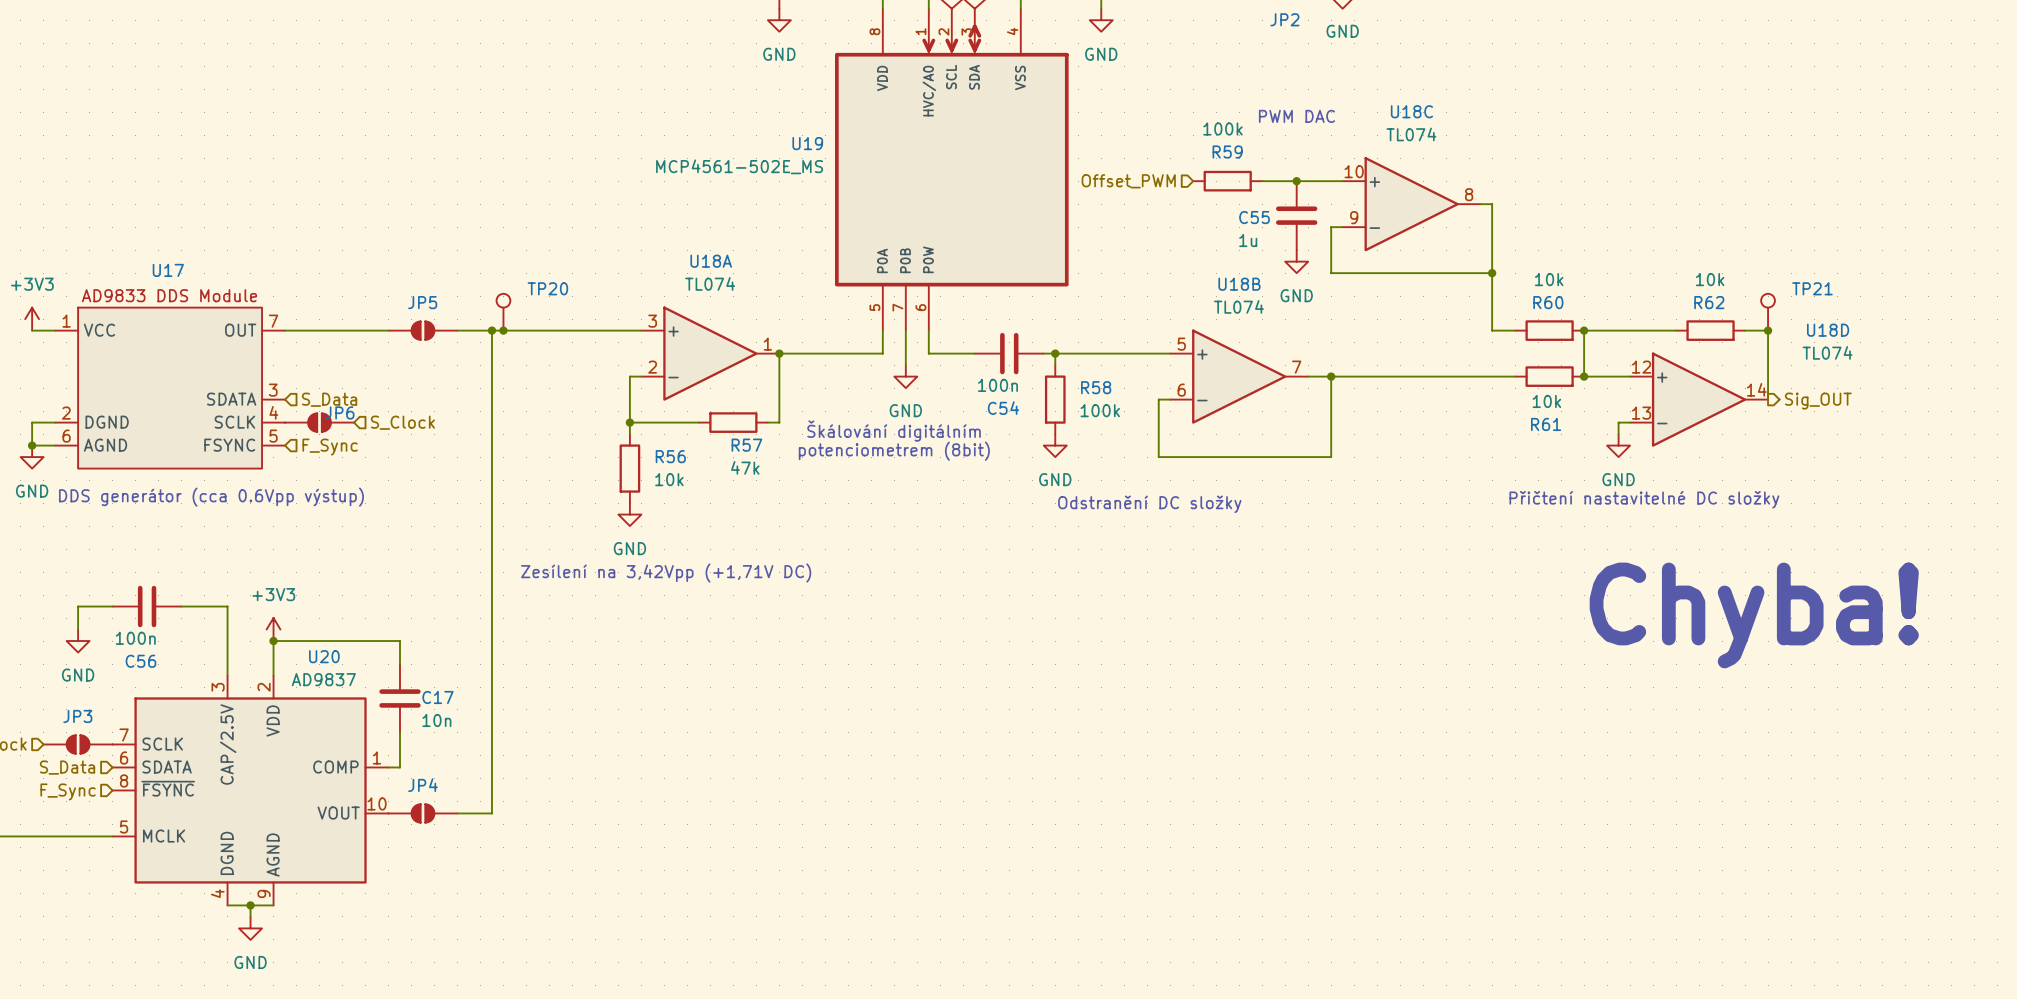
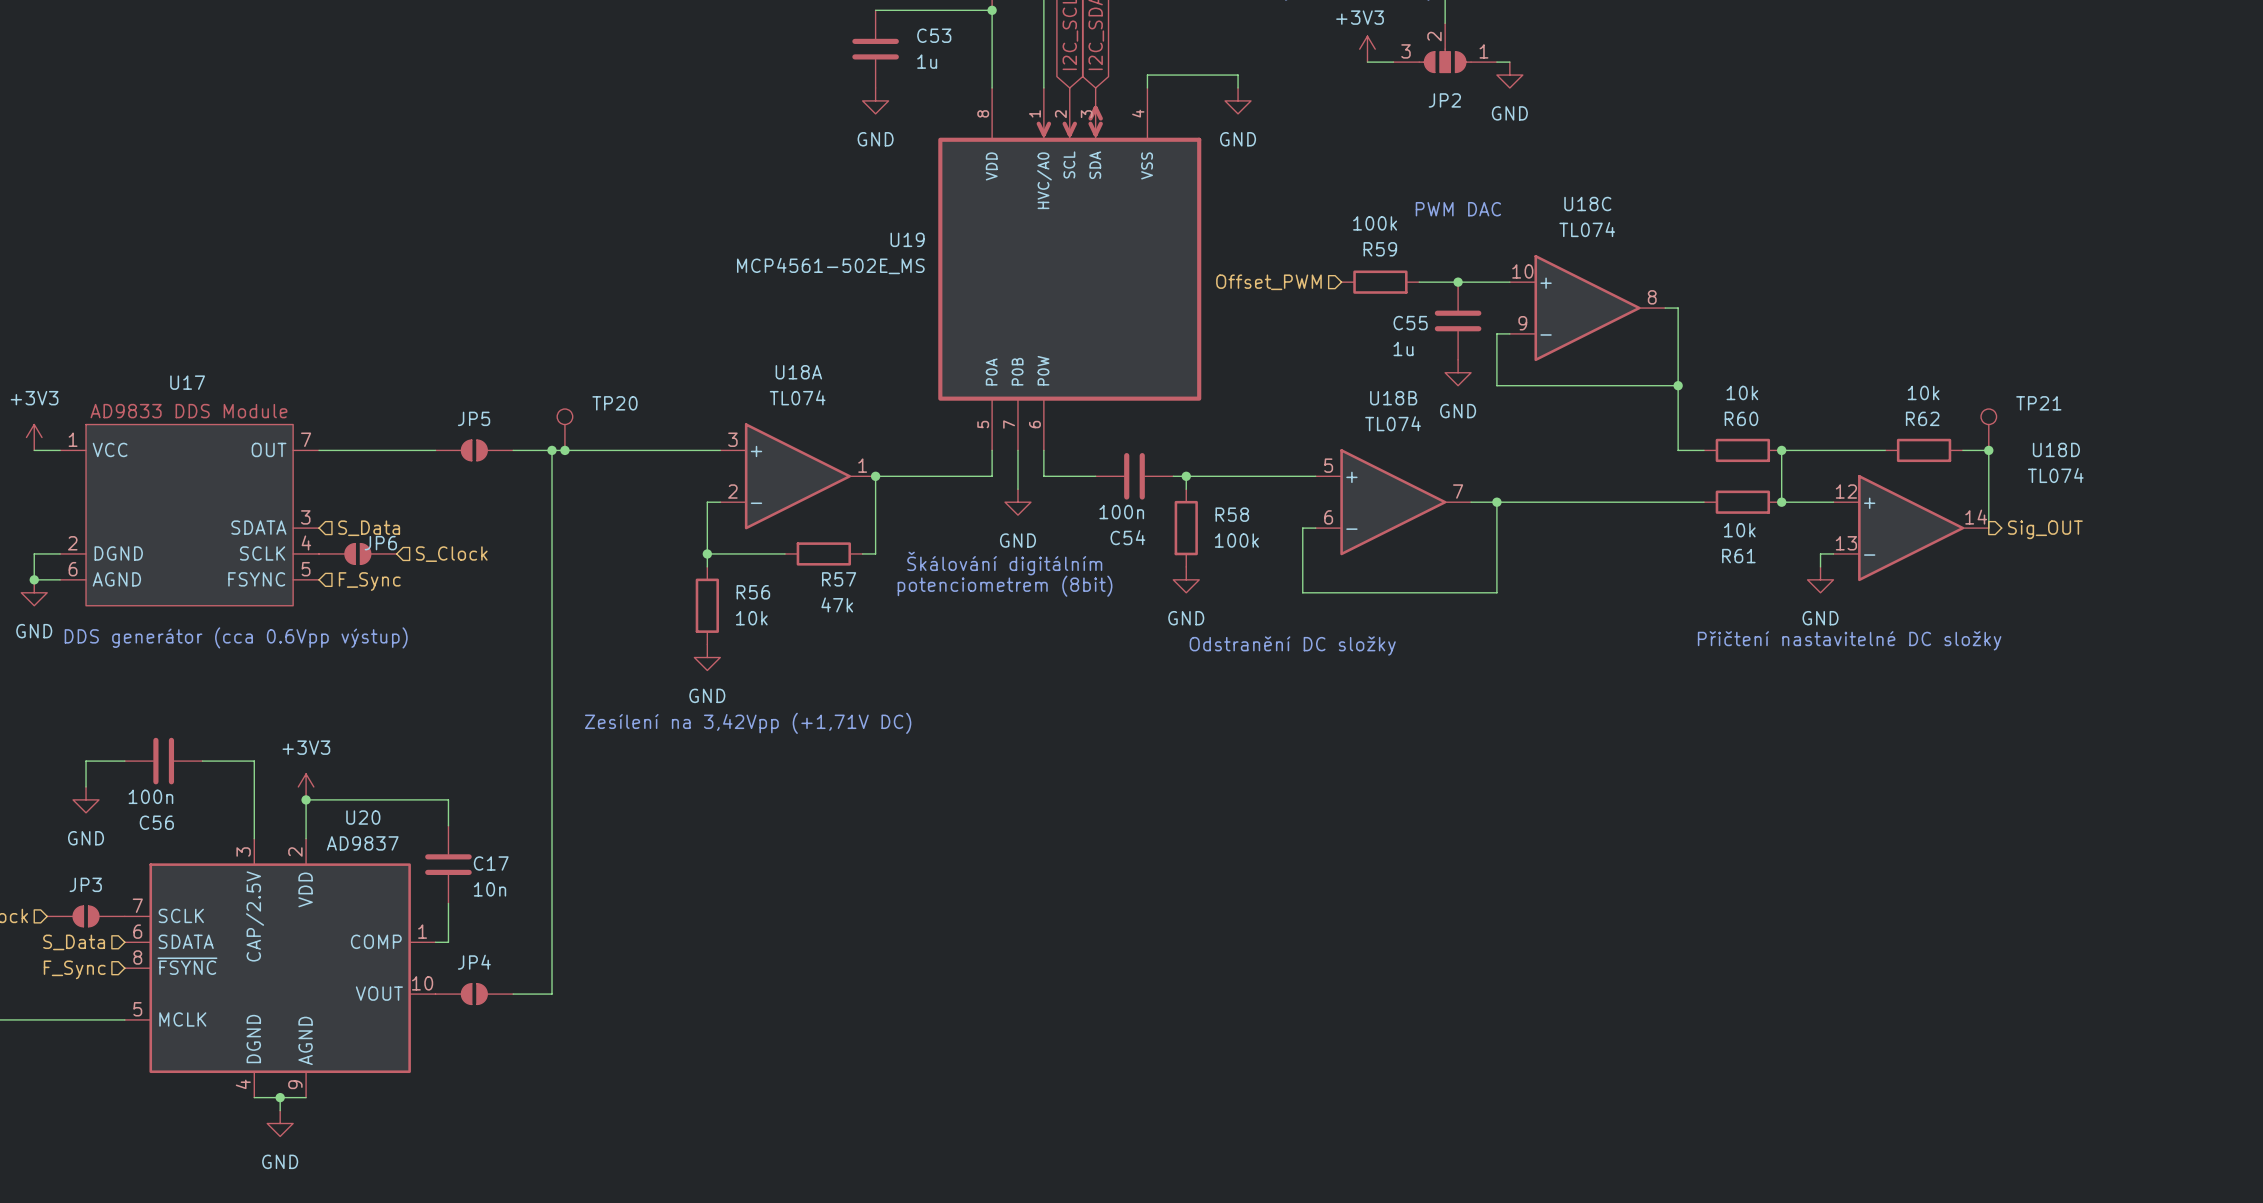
text: Chyba! (1754, 615) -> none

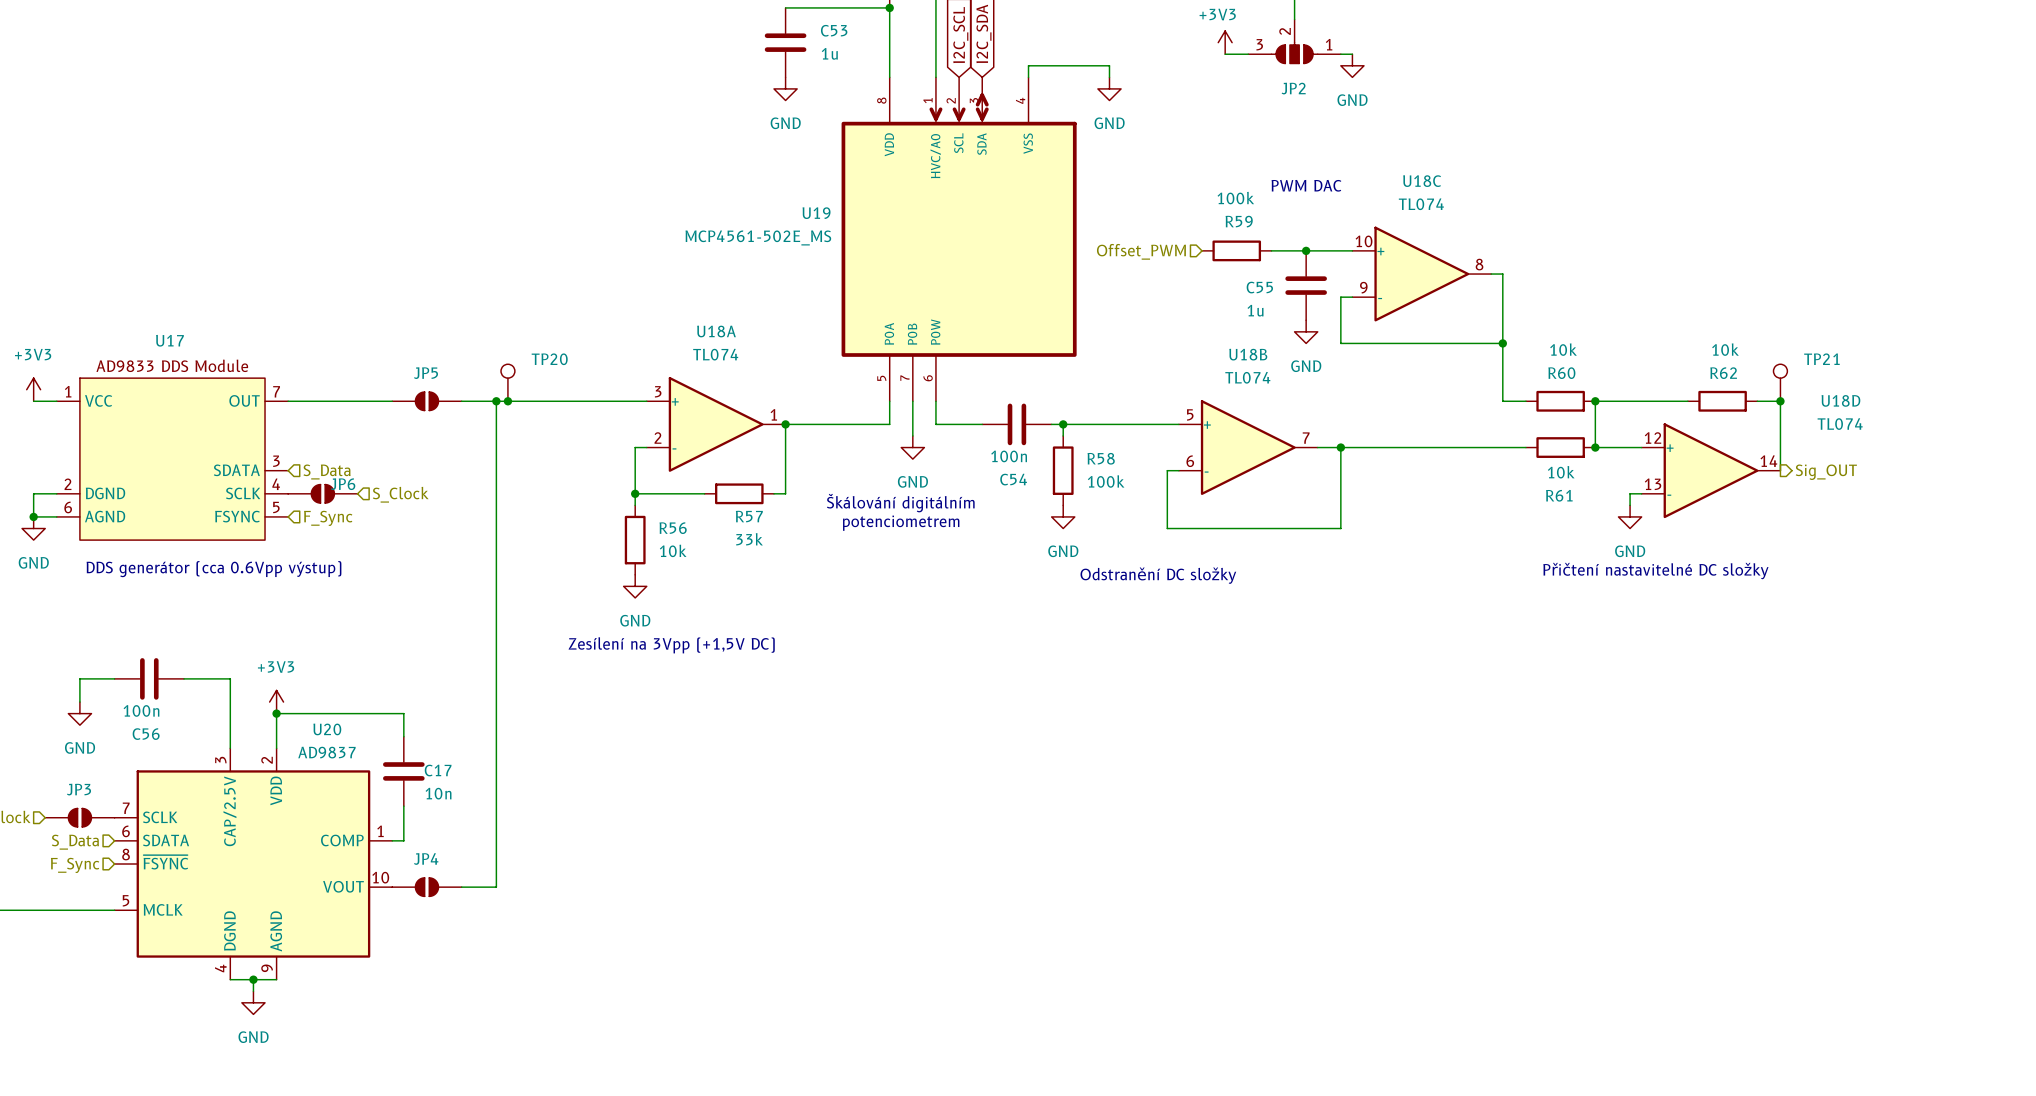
text: potenciometrem (8bit) (1005, 586) -> potenciometrem (901, 523)
R57 value: 47k (837, 604) -> 33k (749, 539)
text: Zesílení na 3,42Vpp (+1,71V DC) (748, 723) -> Zesílení na 3Vpp (+1,5V DC) (671, 645)

